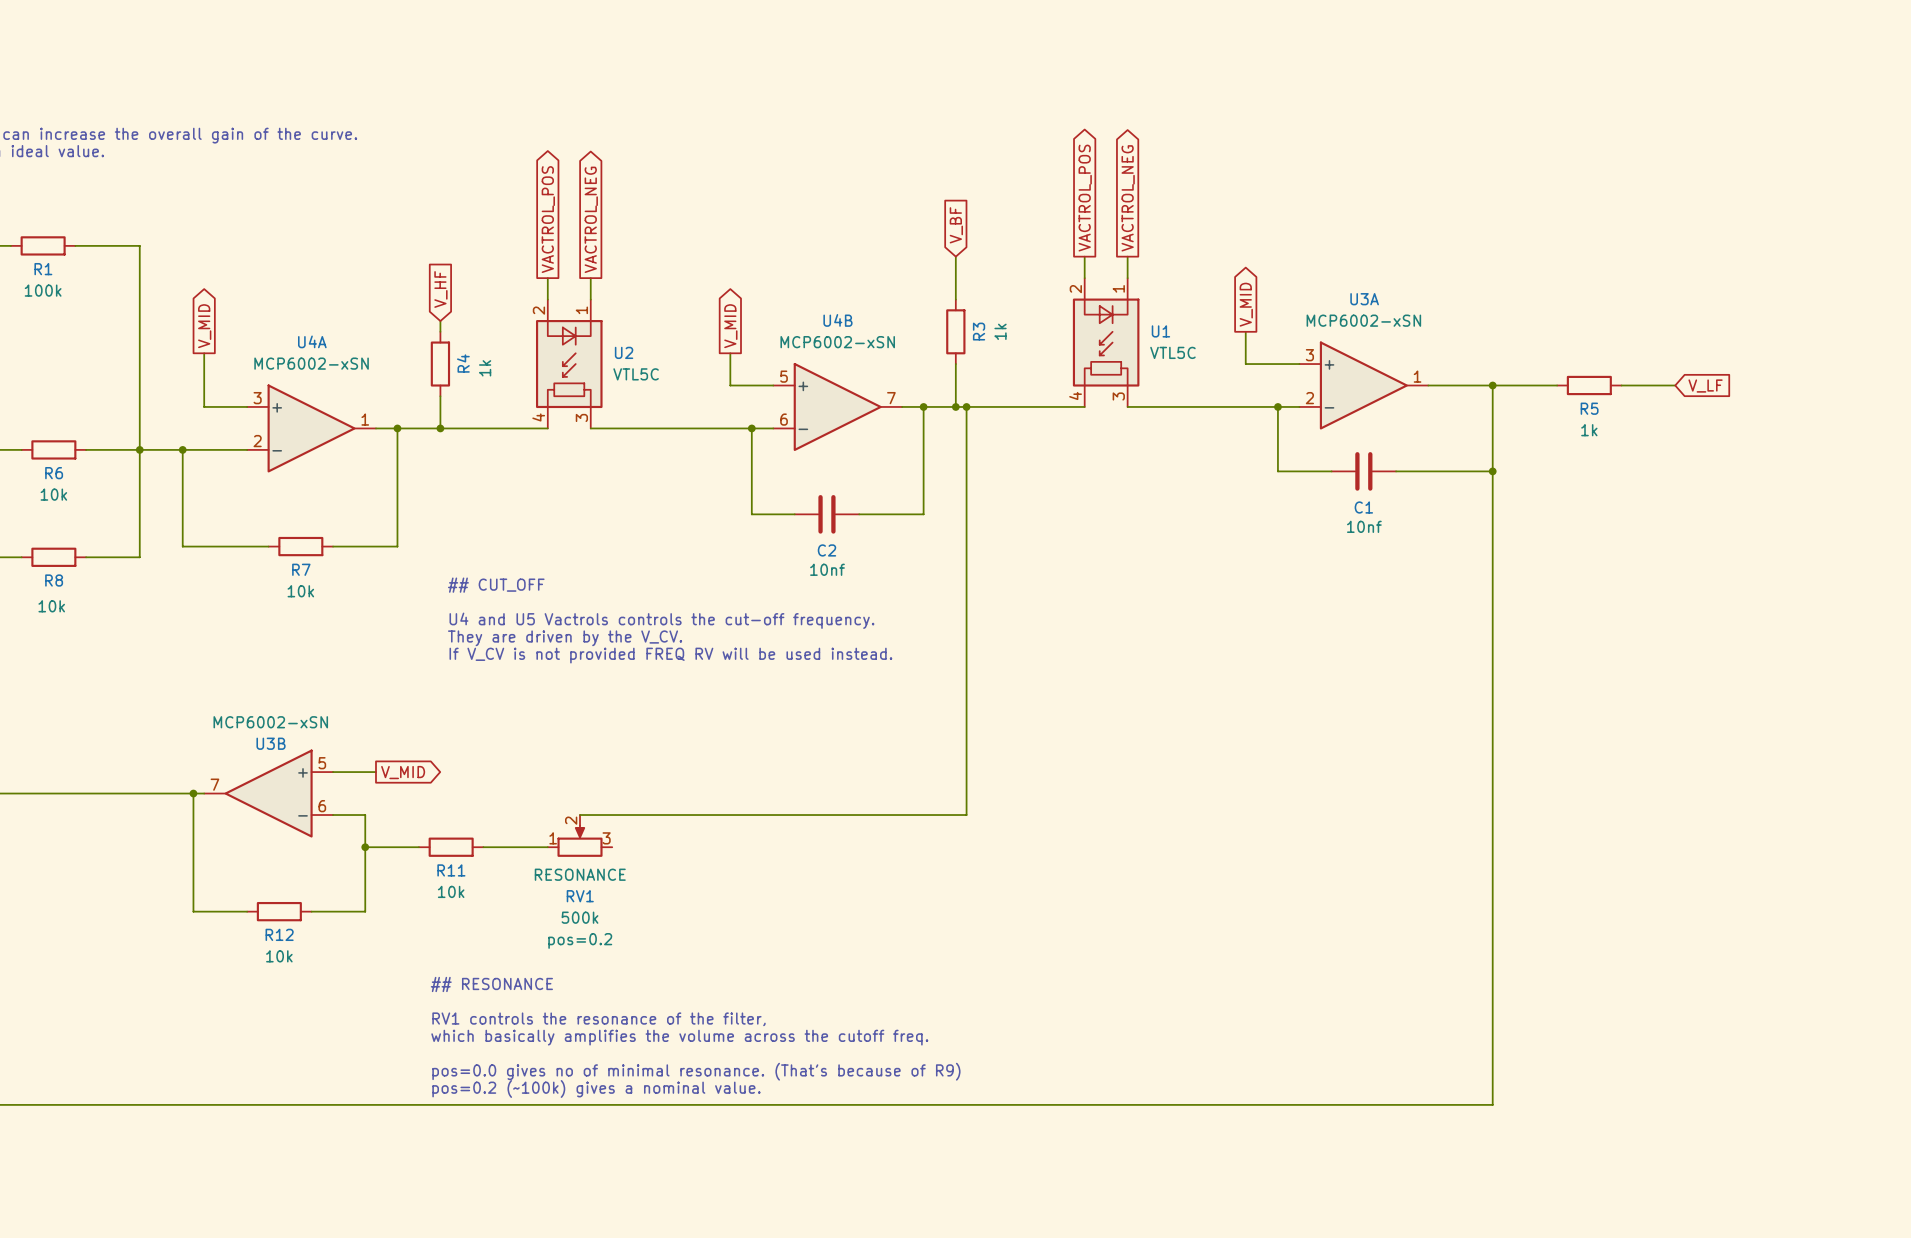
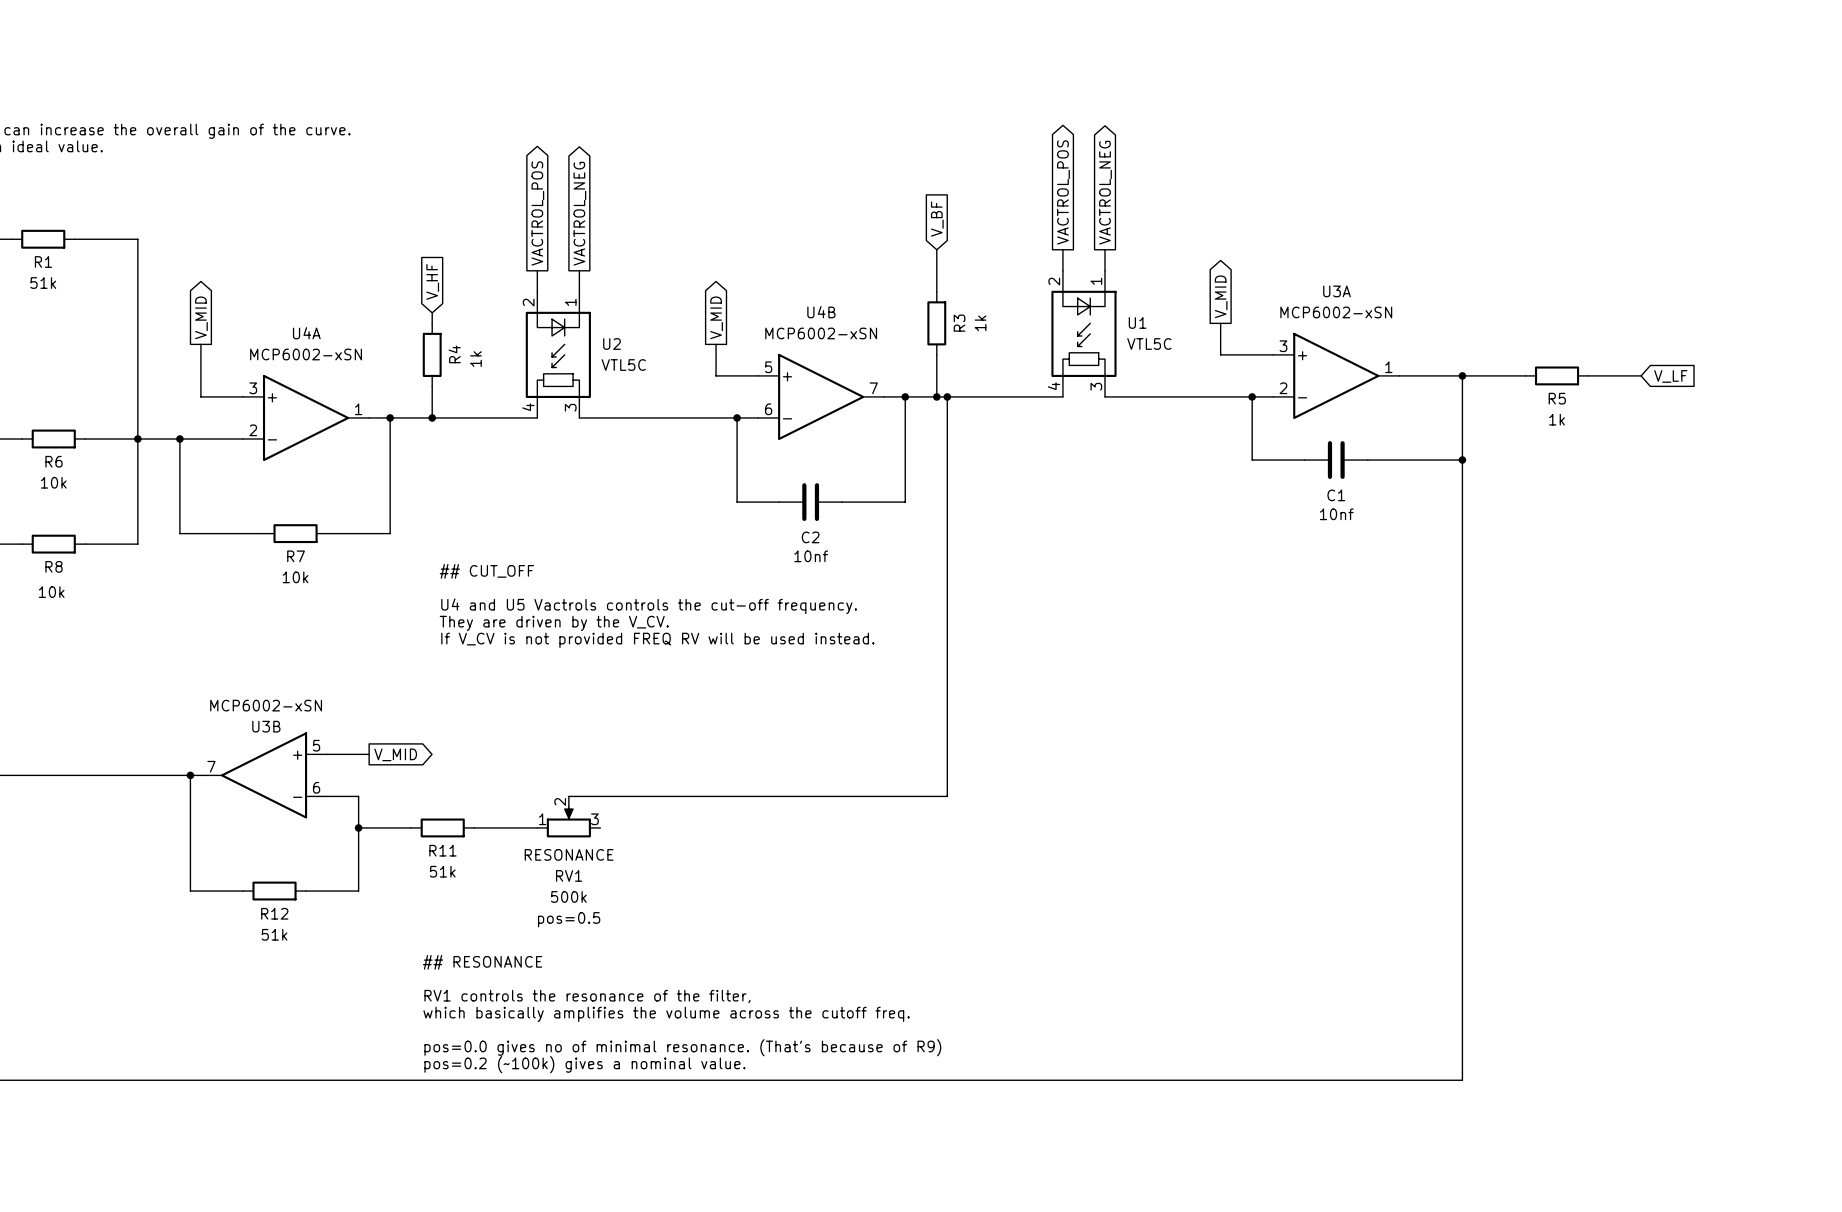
R1 value: 100k (43, 290) -> 51k (43, 283)
R11 value: 10k (451, 891) -> 51k (442, 871)
RV1 text: pos=0.2 (580, 940) -> pos=0.5 (569, 919)
R12 value: 10k (279, 956) -> 51k (274, 934)

